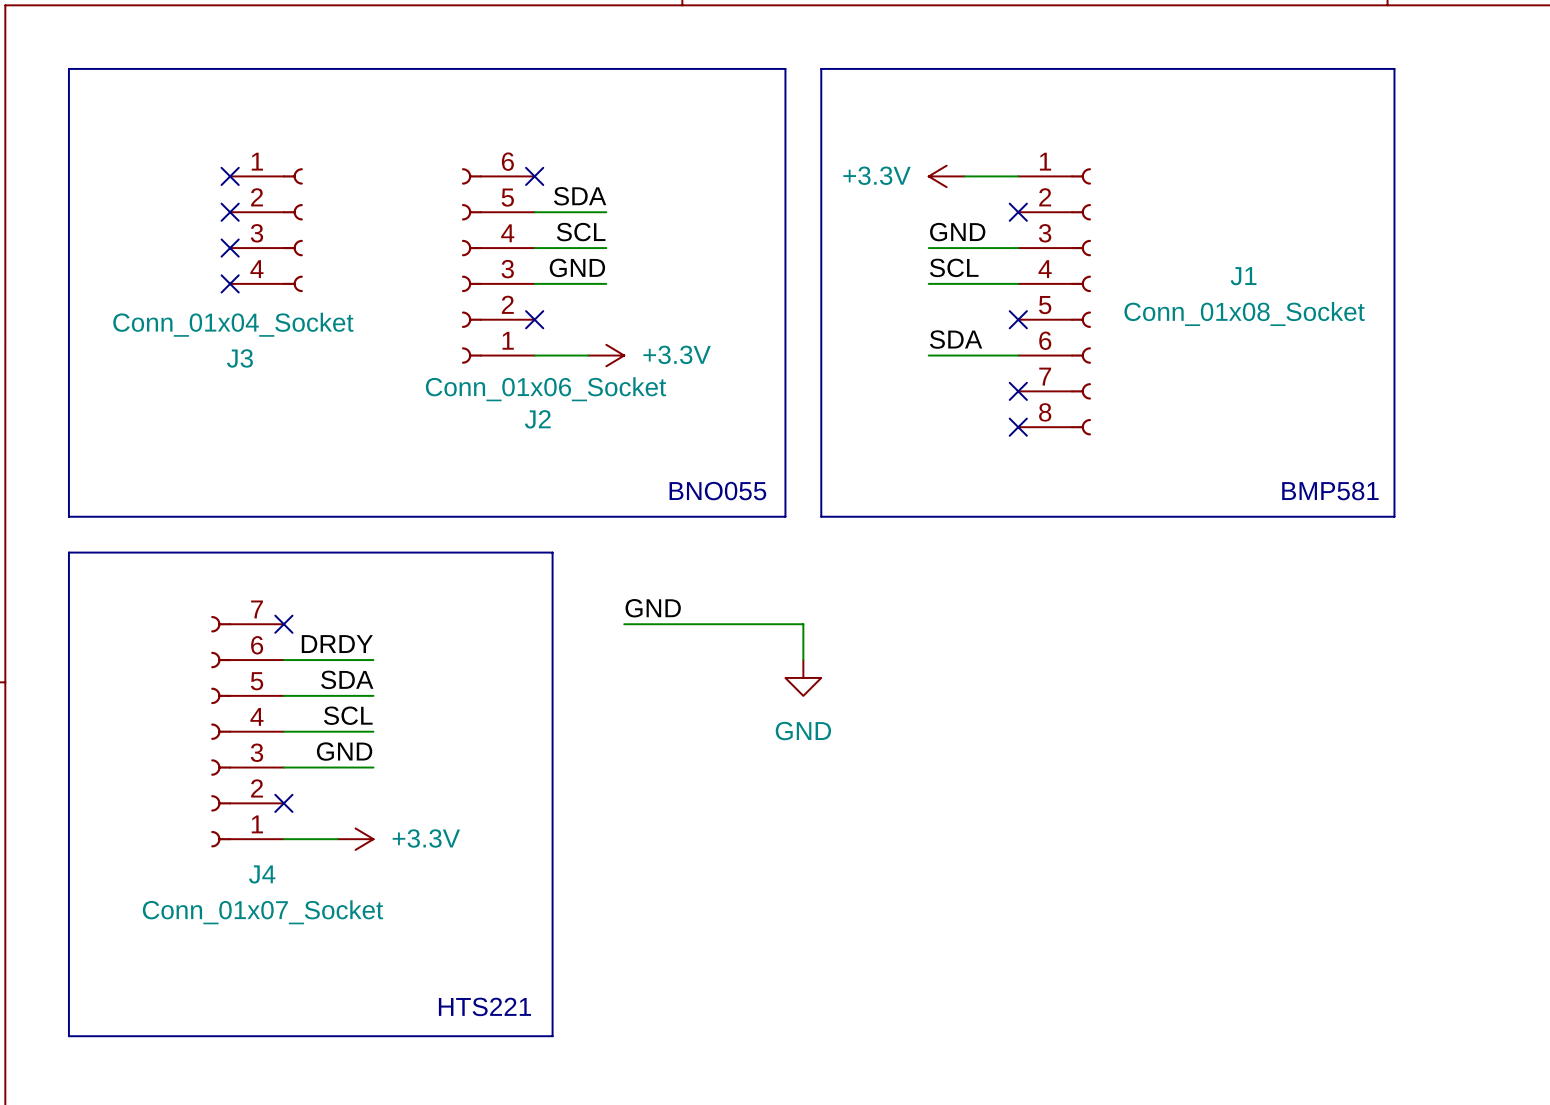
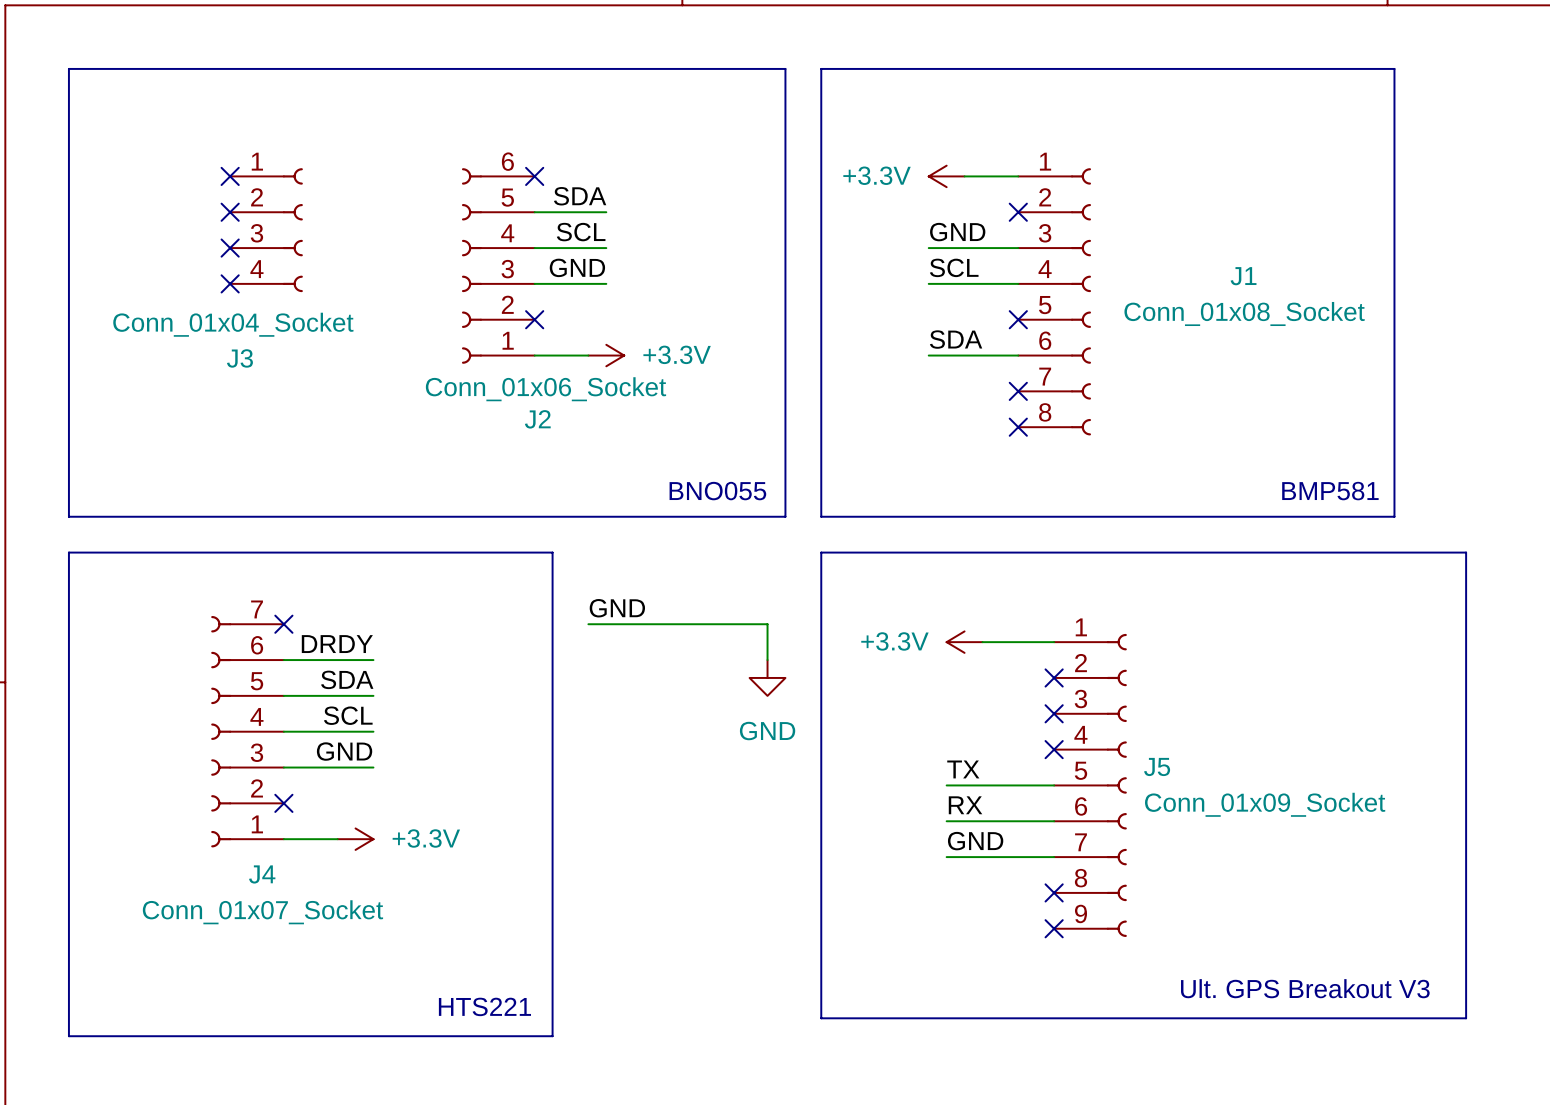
line: none -> (821, 552) (1466, 552) (1466, 1018) (821, 1018) (821, 552)
label position: GND (653, 608) -> GND (617, 608)
wire: none -> (588, 624) (624, 624)
wire: (767, 624) (803, 624) (803, 660) -> (767, 624) (767, 660)
power symbol: none -> +3.3V (964, 642)
wire: none -> (982, 642) (1054, 642)
power symbol position: GND (803, 677) -> GND (767, 677)
no-connect mark: none -> (1054, 677)
no-connect mark: none -> (1054, 713)
no-connect mark: none -> (1054, 749)
label: none -> TX (963, 769)
wire: none -> (946, 785) (1054, 785)
J5: none -> Conn_01x09_Socket (1090, 785)
label: none -> RX (965, 805)
wire: none -> (946, 821) (1054, 821)
label: none -> GND (975, 841)
wire: none -> (946, 857) (1054, 857)
no-connect mark: none -> (1054, 892)
no-connect mark: none -> (1054, 928)
text: none -> Ult. GPS Breakout V3 (1305, 988)

